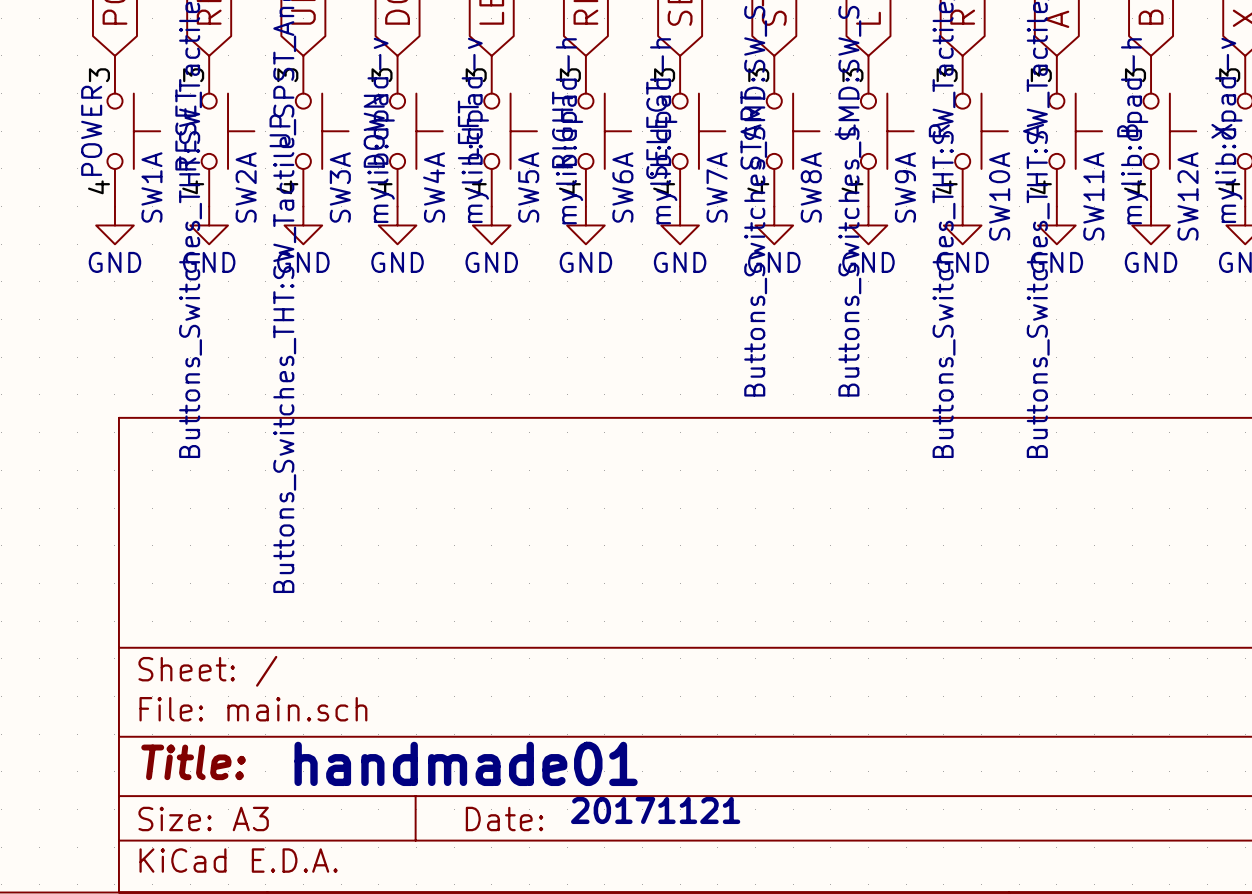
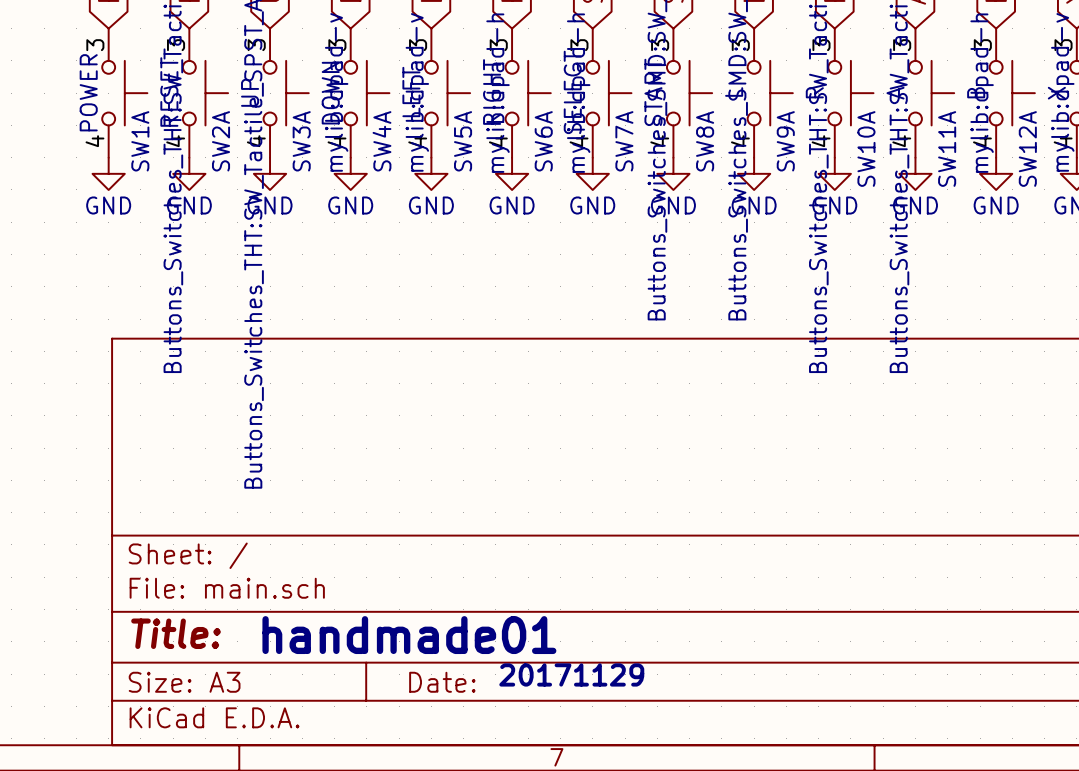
text: 20171121 (655, 810) -> 20171129 (571, 674)

